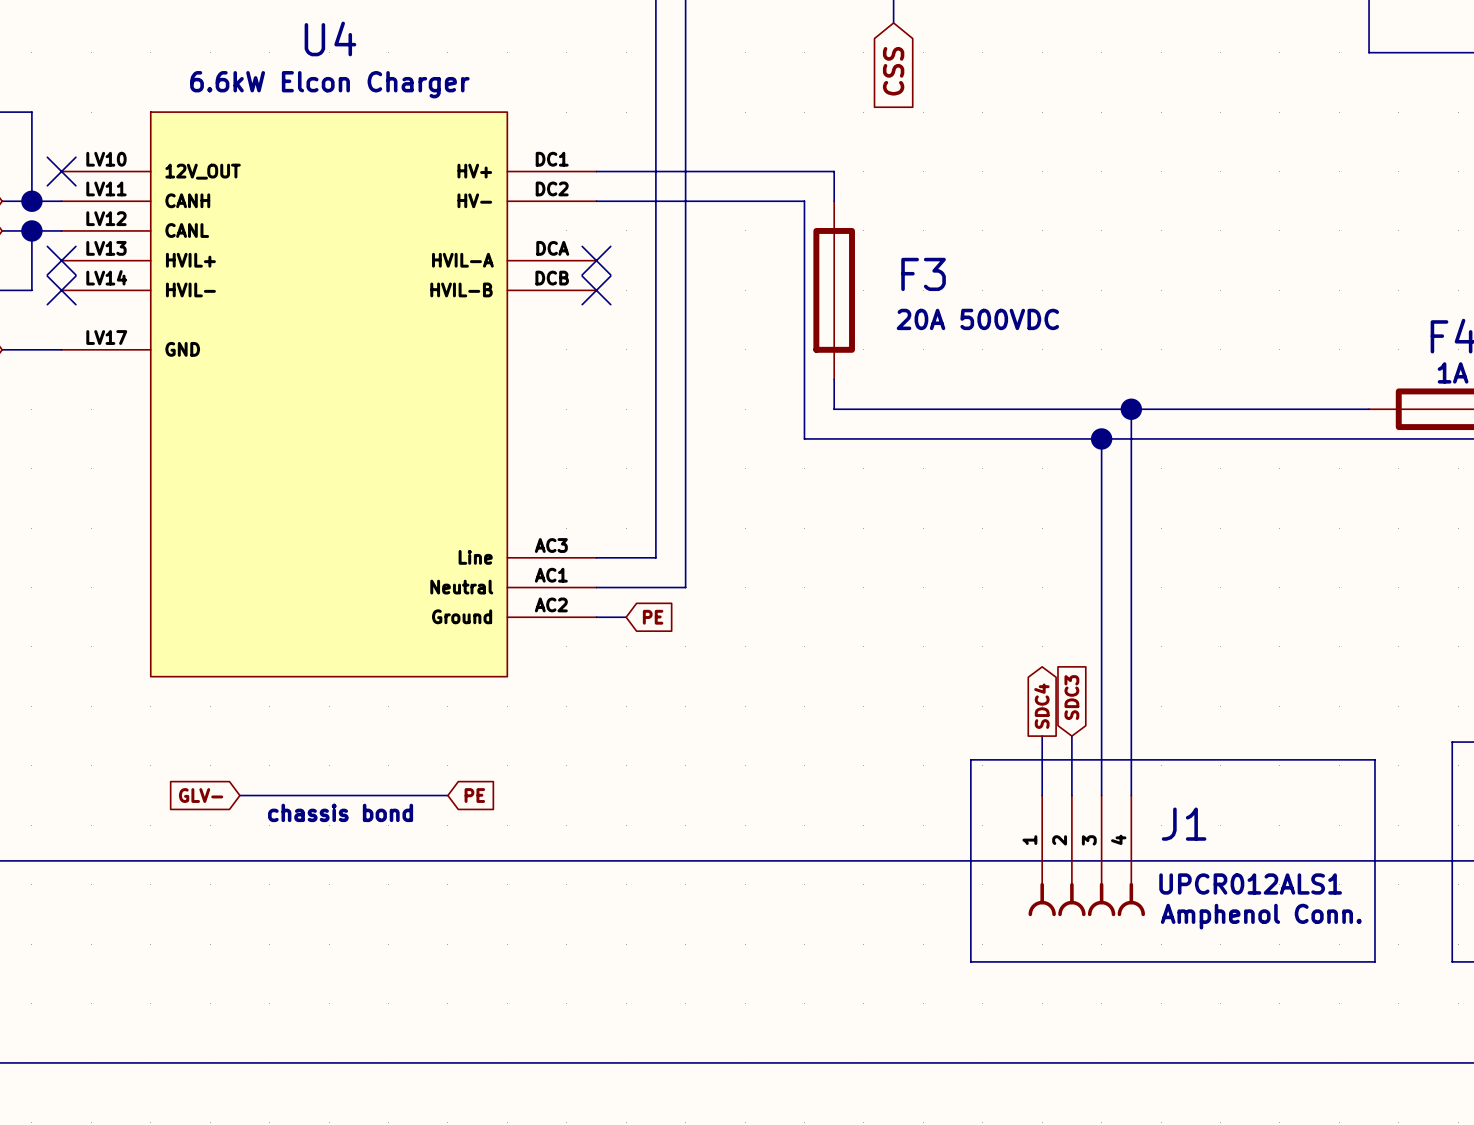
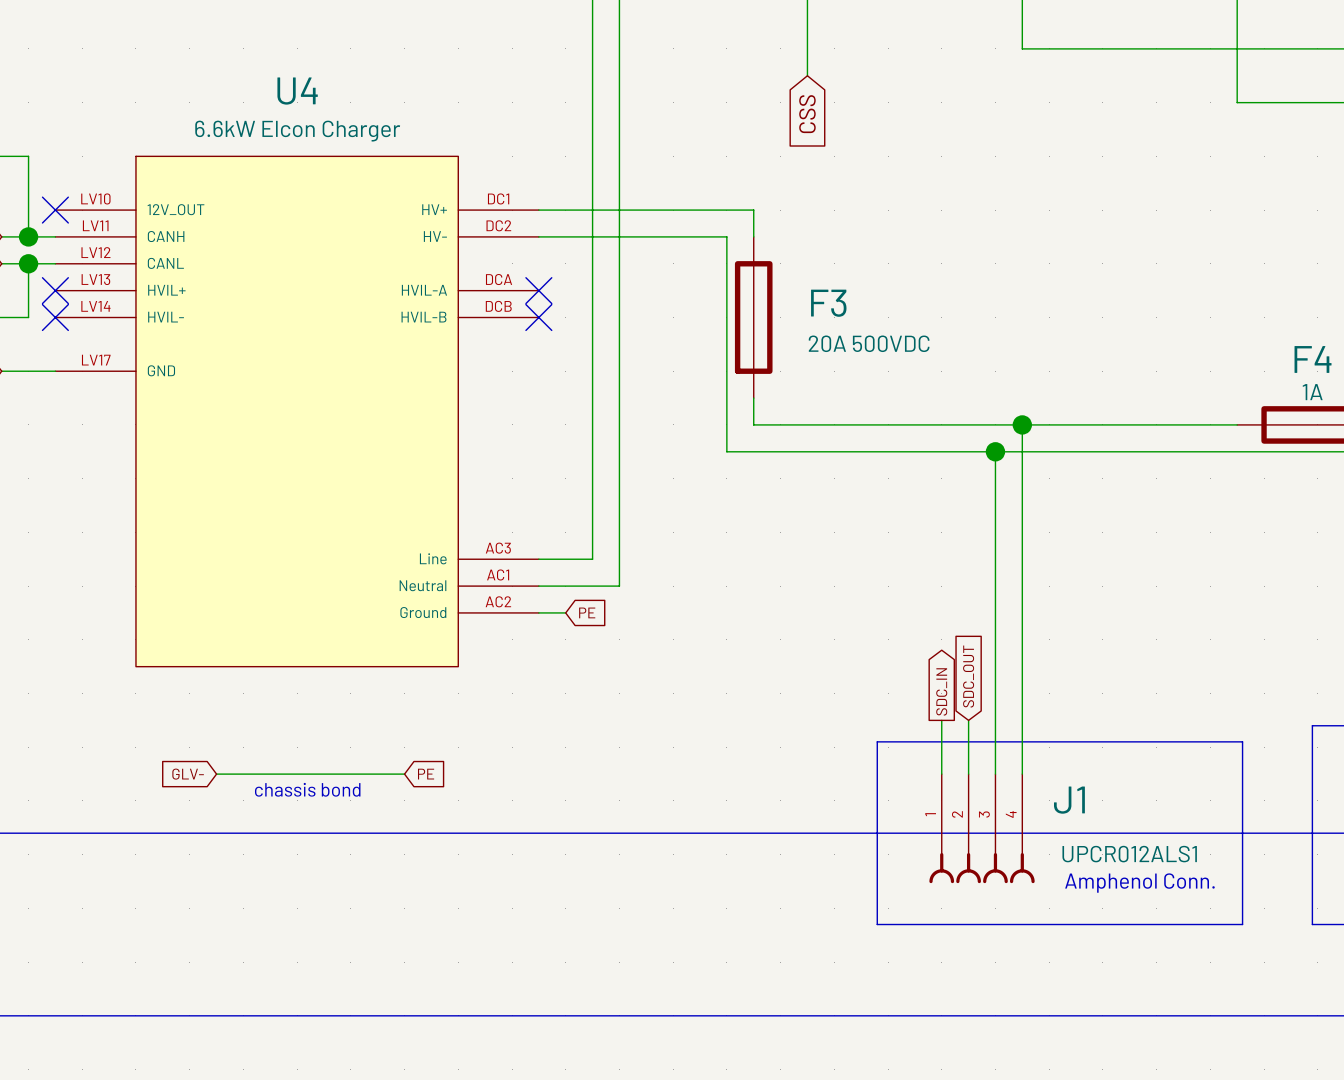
global label: SDC3 (1071, 697) -> SDC_OUT (968, 676)
global label: SDC4 (1041, 706) -> SDC_IN (941, 691)

